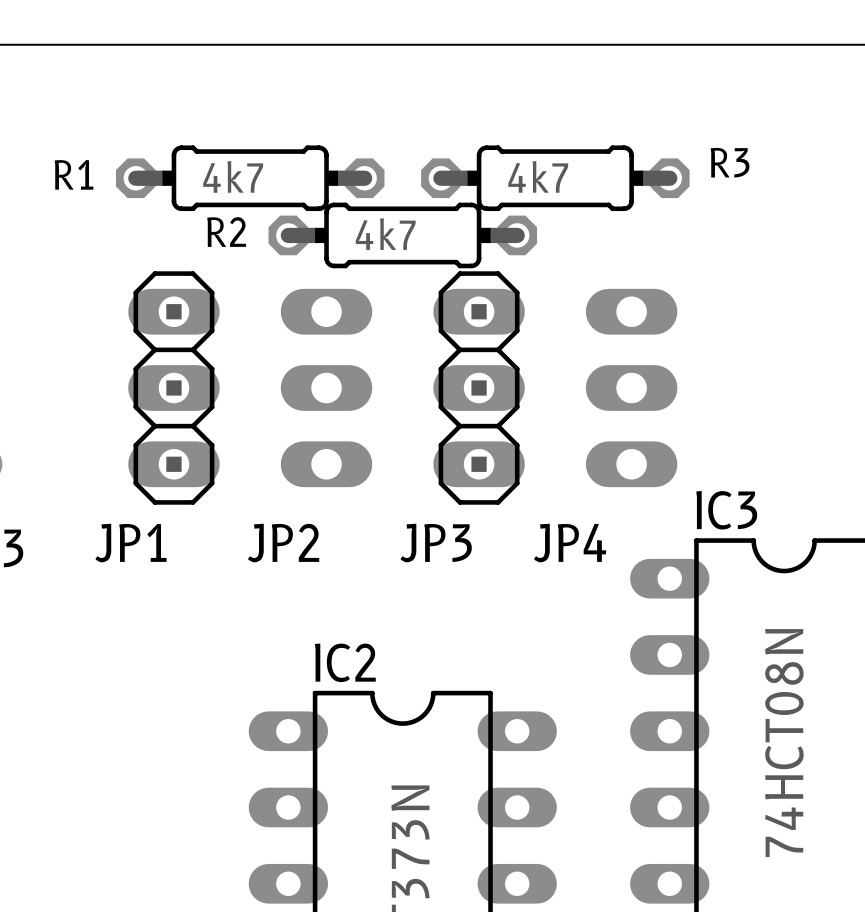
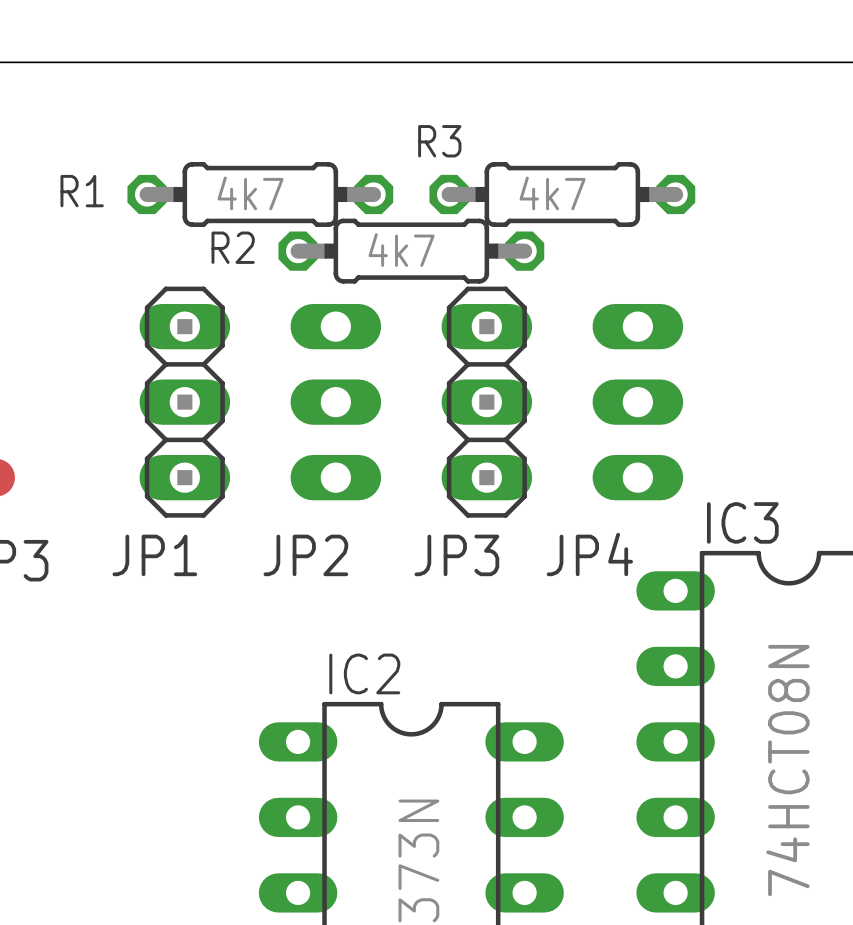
R3 name position: R3 (730, 162) -> R3 (439, 141)

